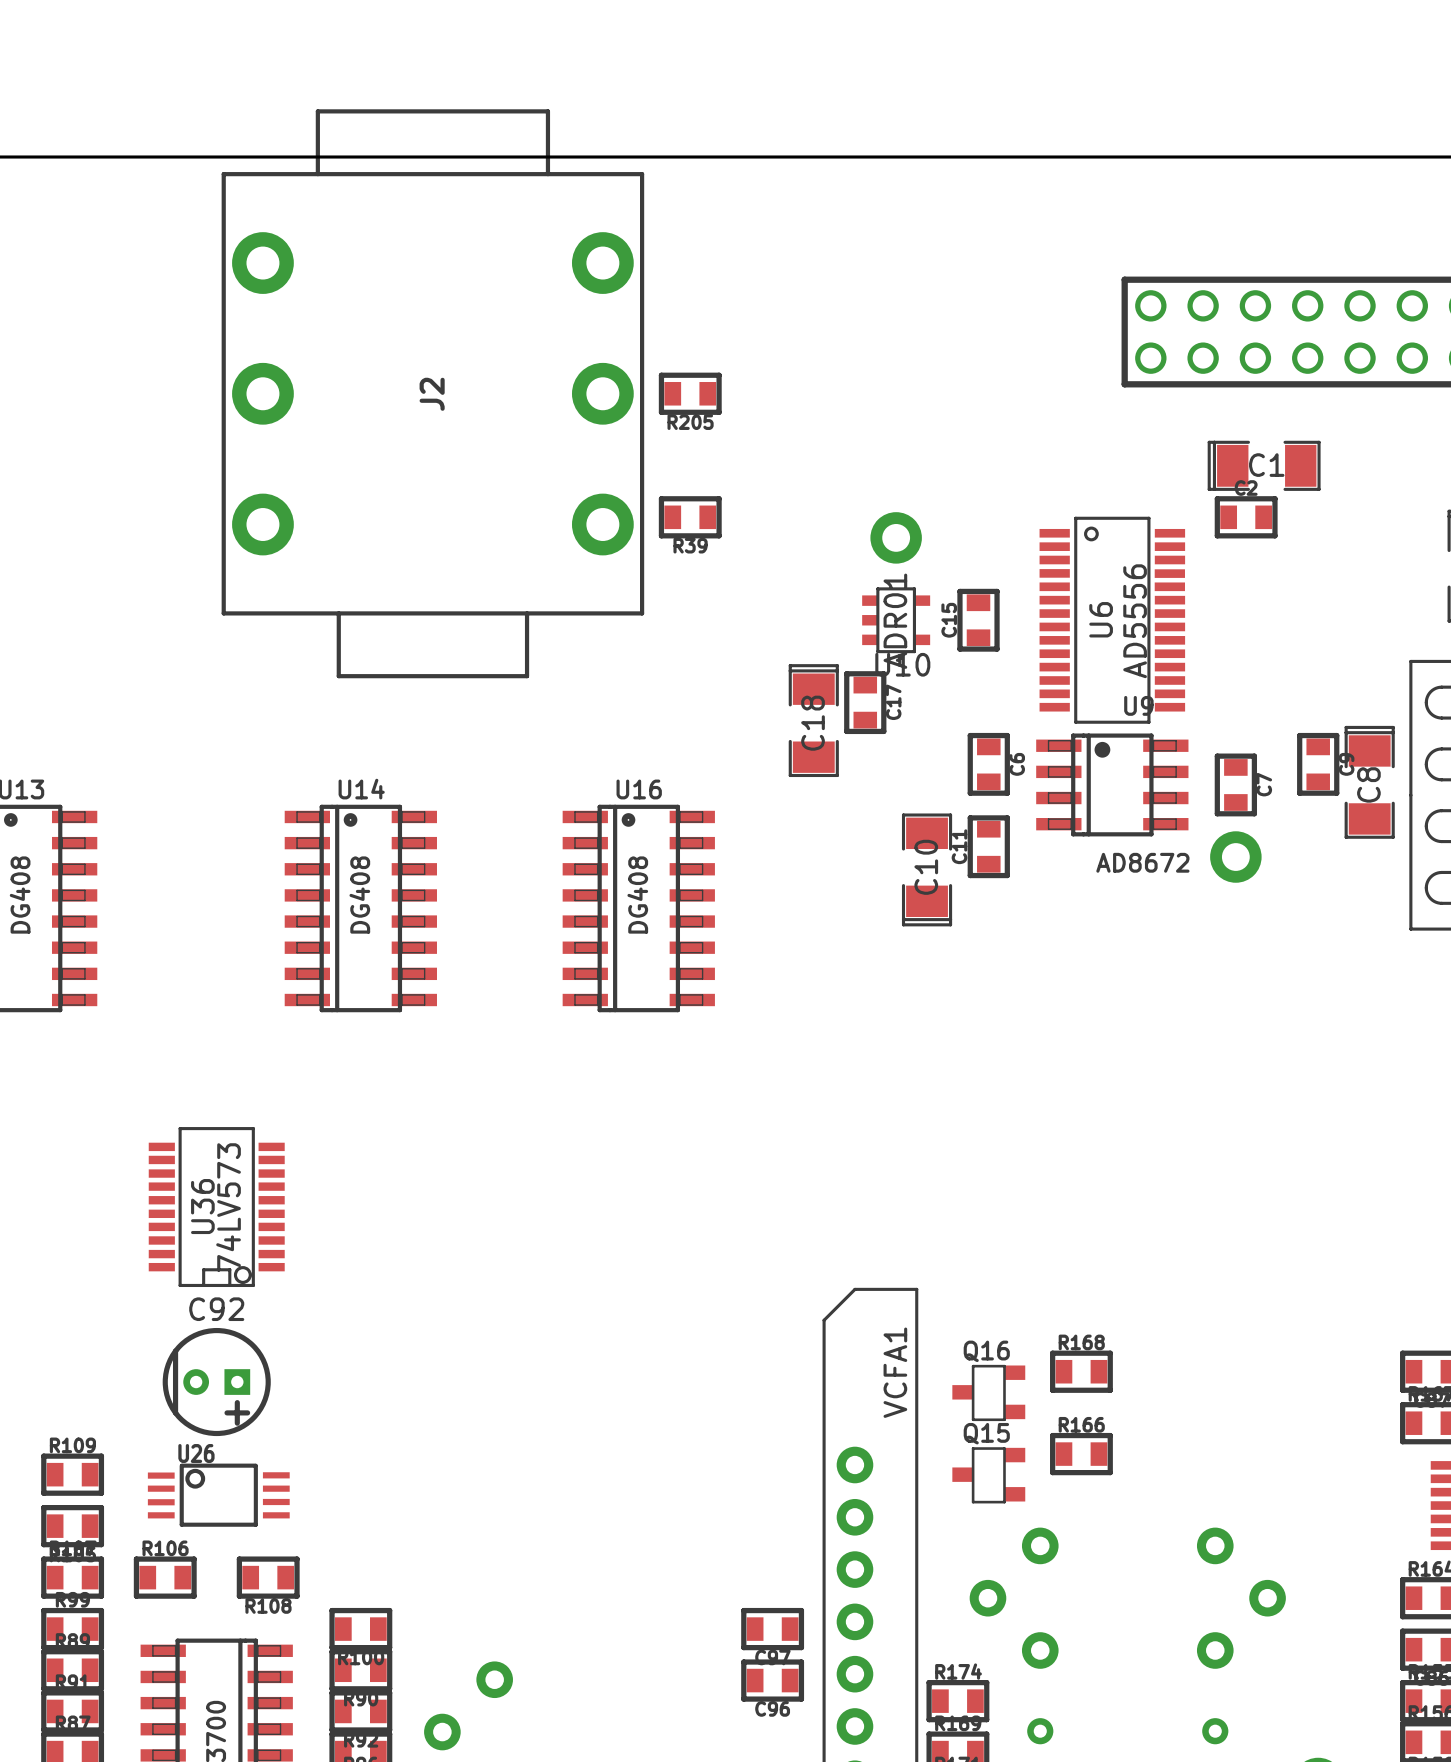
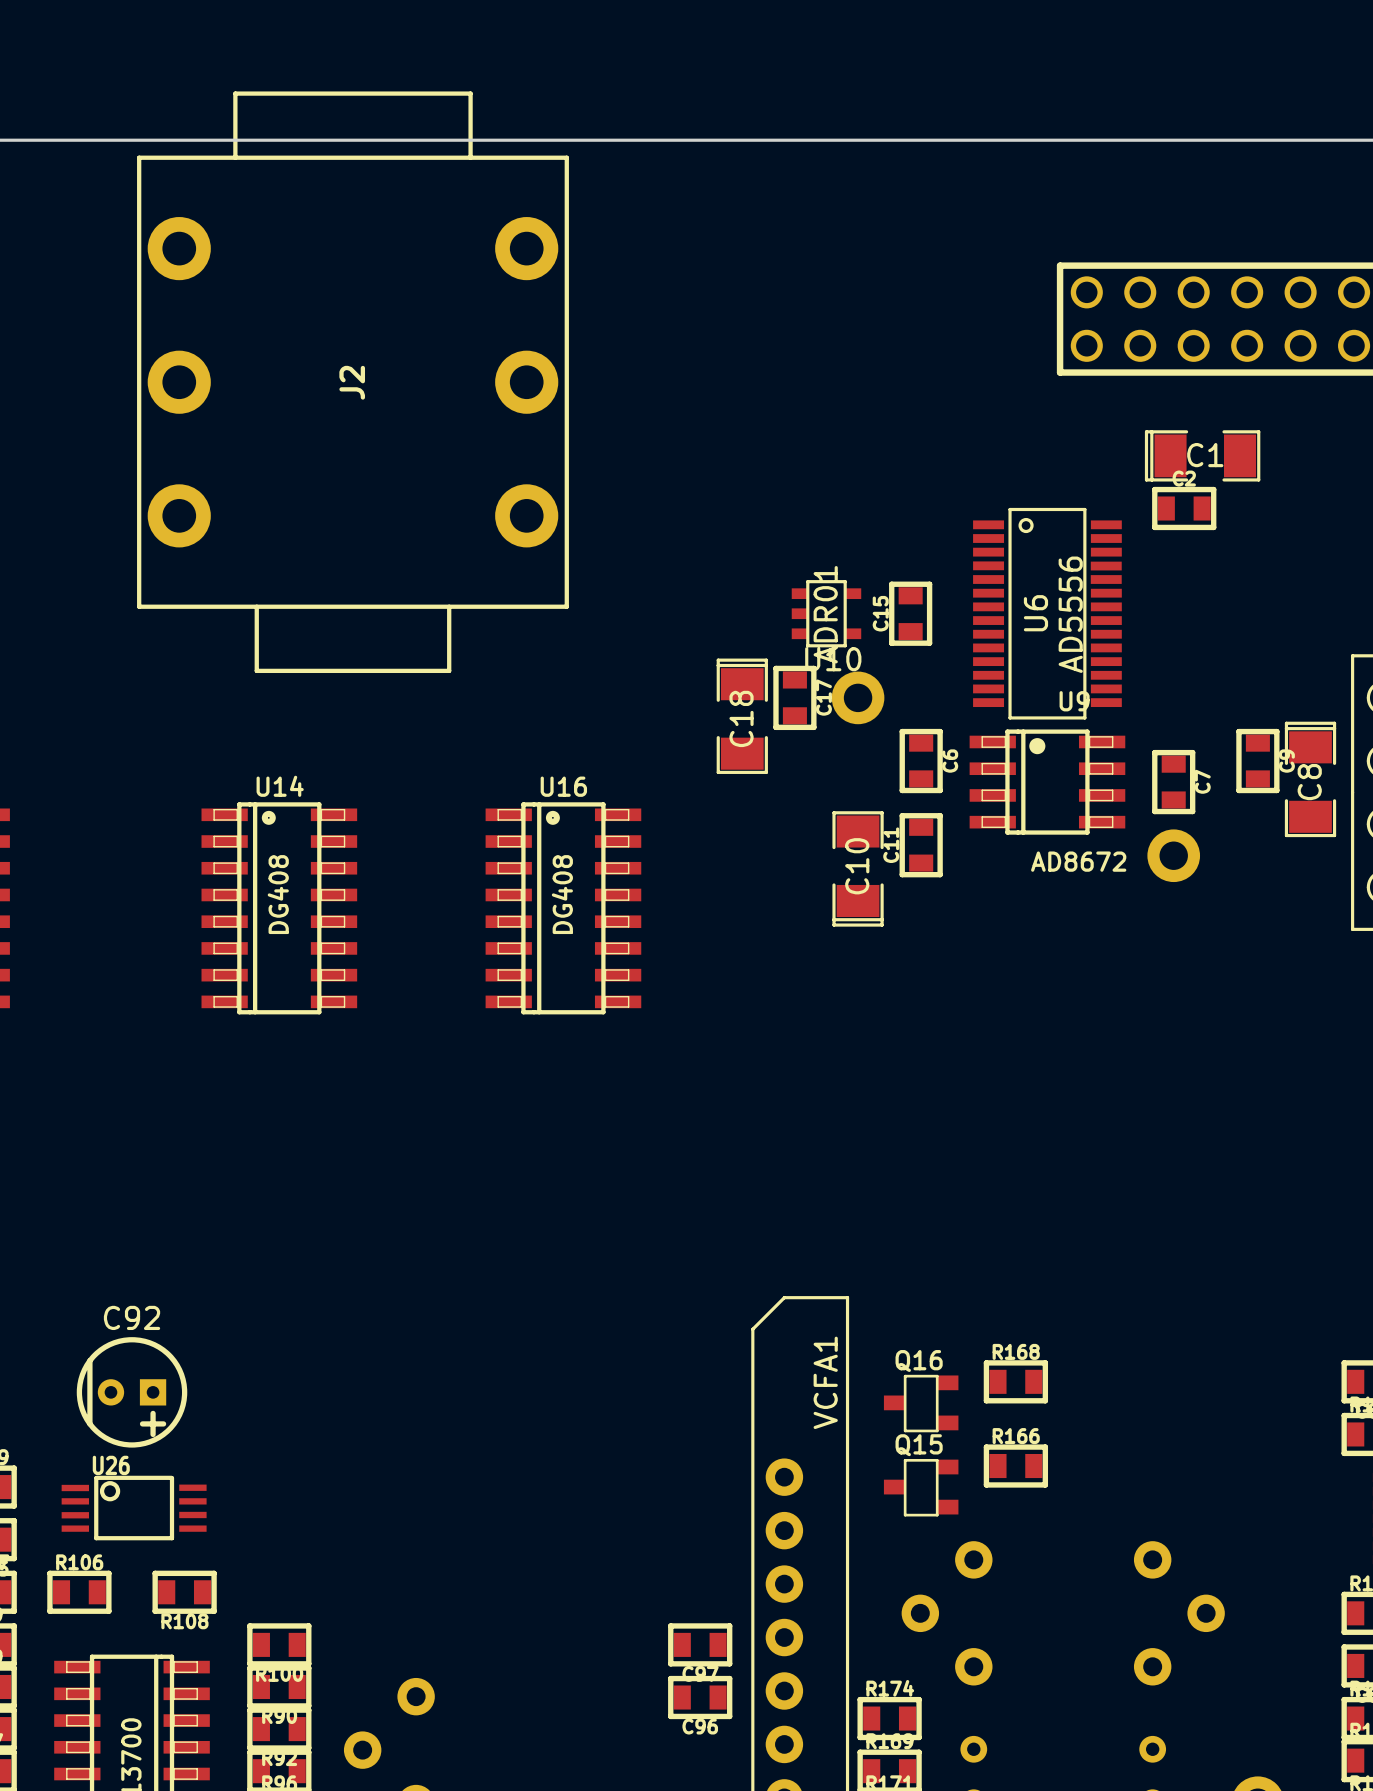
R205: (690, 393) -> none
R39: (690, 517) -> none
part position: (896, 537) -> (858, 697)
U36: 74LV573 (216, 1207) -> none

